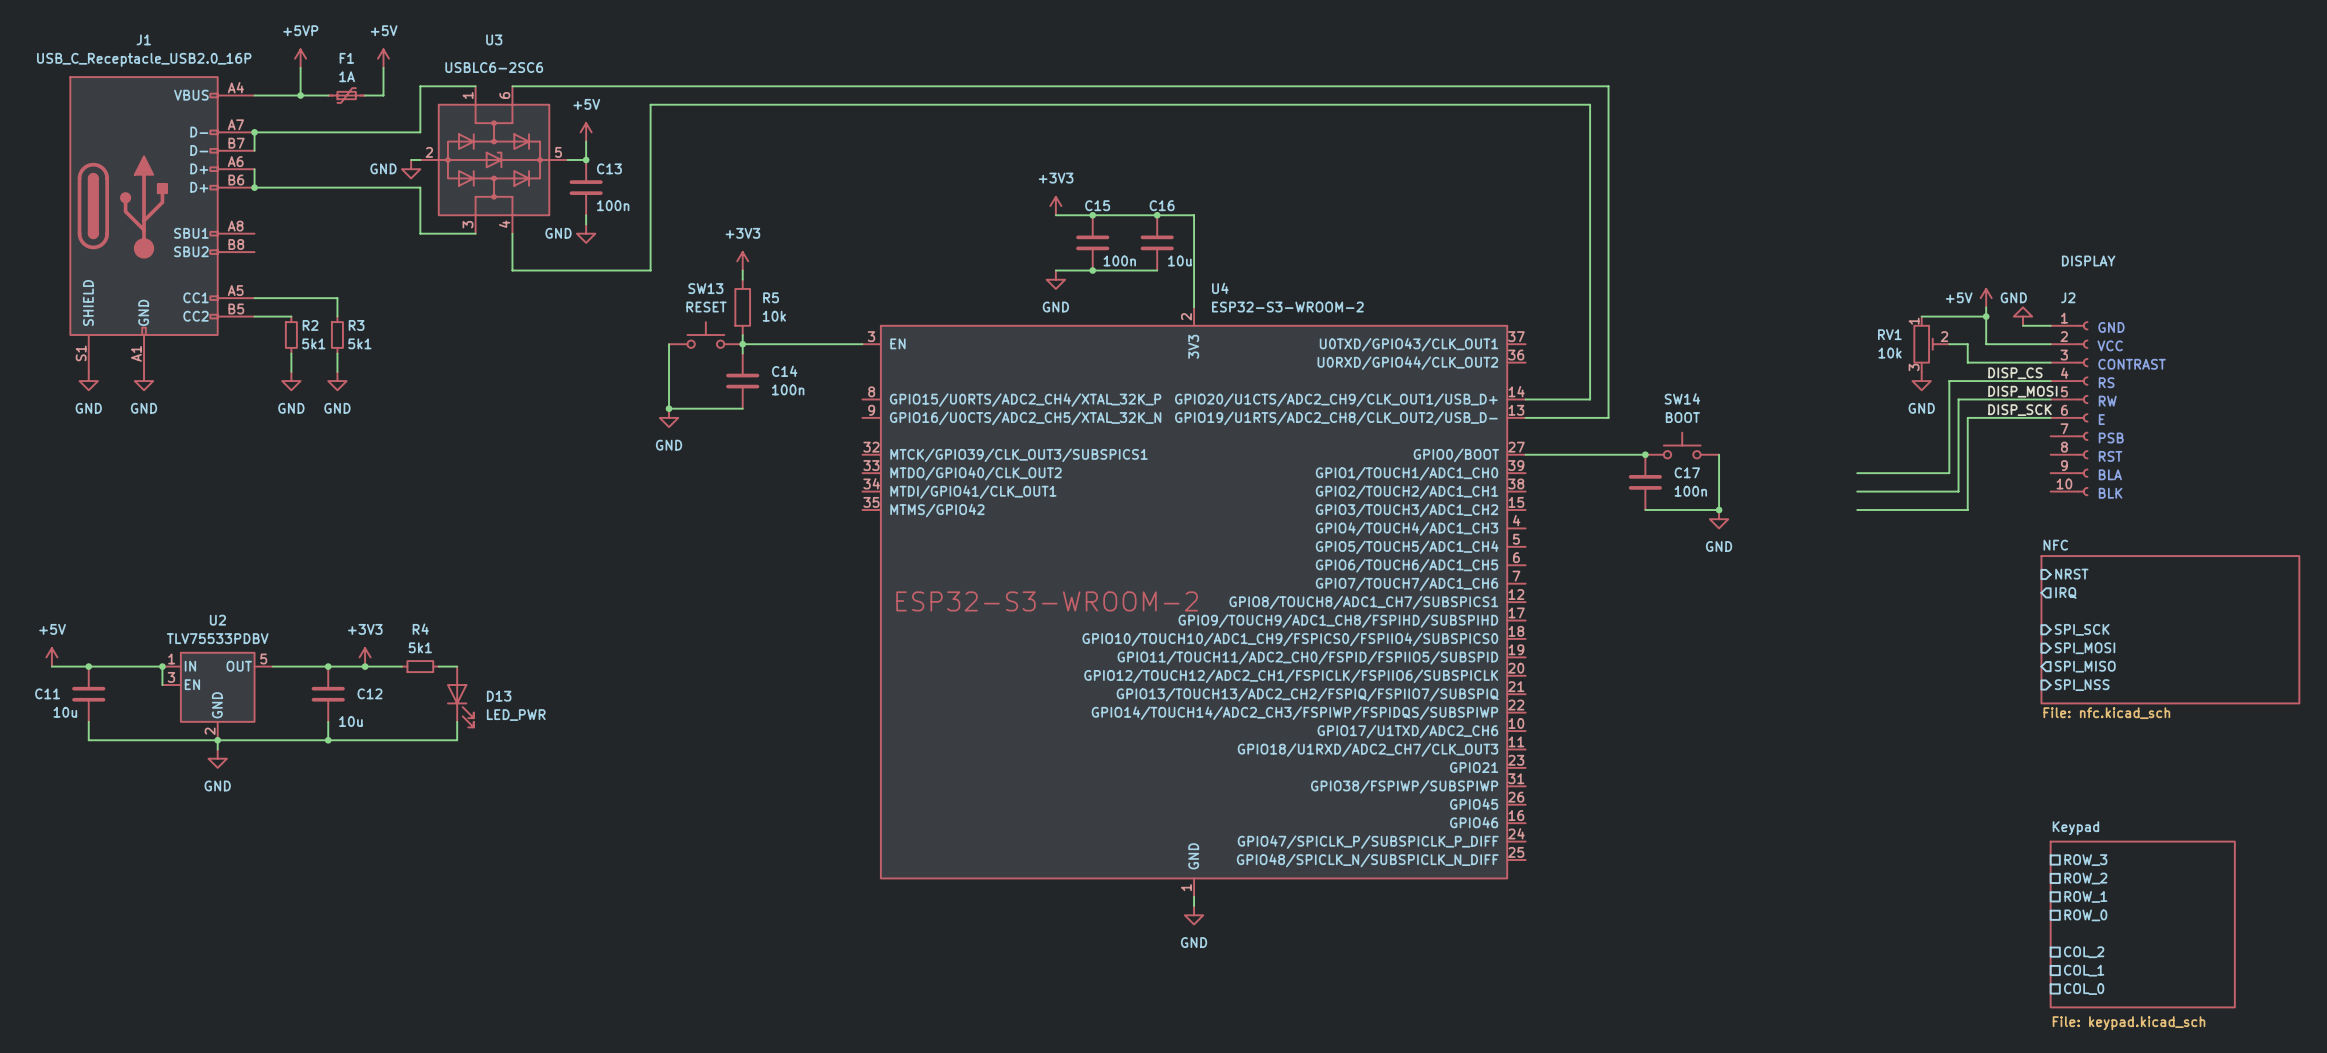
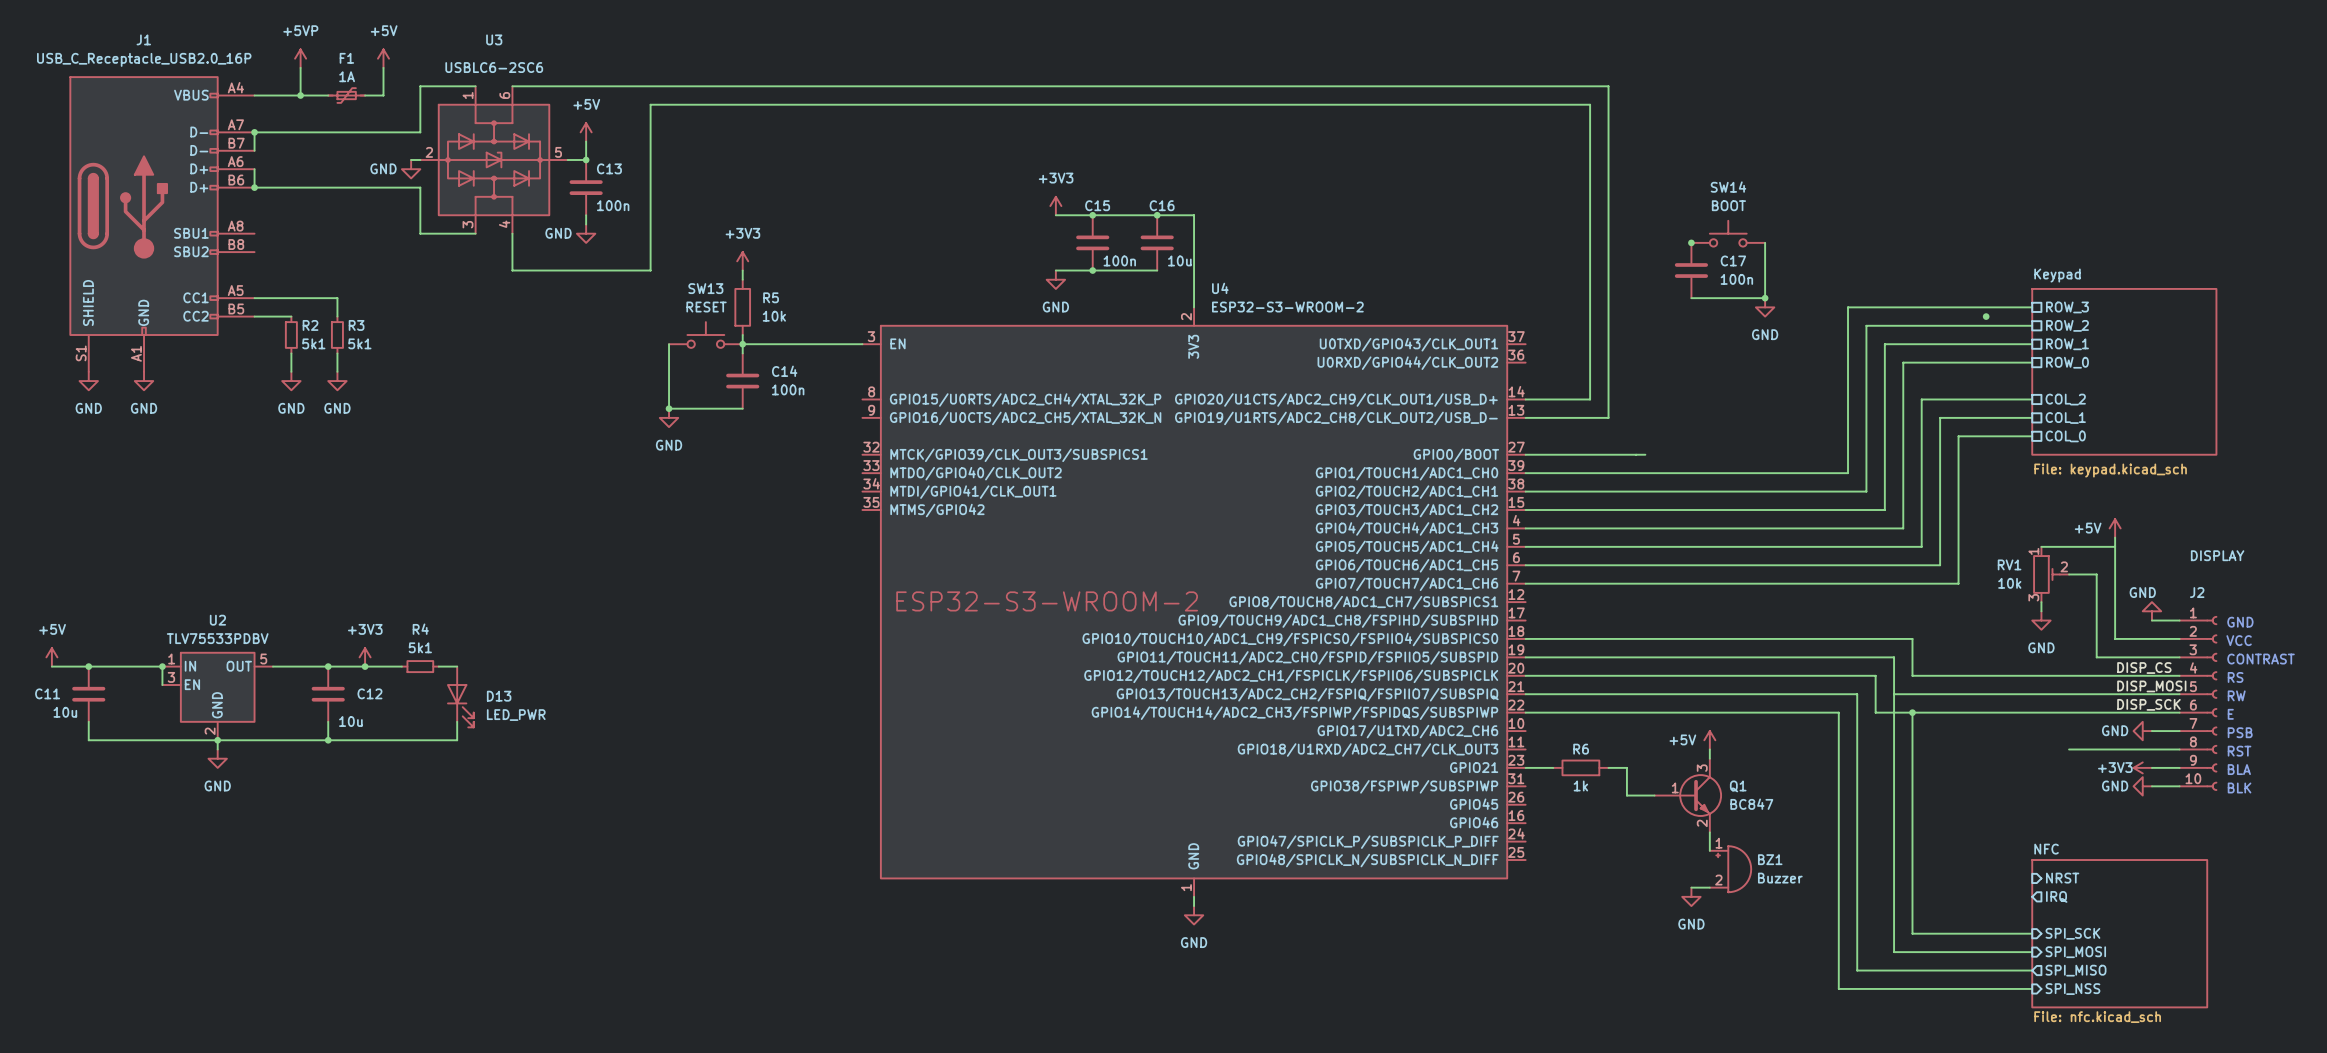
junction: none -> (1691, 242)
wire: none -> (1765, 242) (1765, 298) (1691, 298)
junction: none -> (1765, 298)
power symbol: +5V (1986, 298) -> none
power symbol: none -> GND (1765, 307)
wire: (1986, 307) (1986, 344) -> none
wire: none -> (2032, 307) (1848, 307) (1848, 473) (1525, 473)
sheet pin: none -> ROW_3 (2067, 307)
wire: (1921, 316) (1986, 316) -> none
power symbol: GND (2023, 316) -> none
wire: (2032, 325) (2050, 325) -> none
sheet pin: none -> ROW_2 (2067, 325)
text: GND (2111, 327) -> none
RV1 position: (1931, 344) -> (2051, 574)
wire: (1967, 344) (1967, 362) -> (1967, 344) (1986, 344)
wire: (2032, 344) (2050, 344) -> none
sheet pin: none -> ROW_1 (2067, 344)
text: VCC (2110, 345) -> none
wire: none -> (1967, 362) (1903, 362) (1903, 528) (1525, 528)
wire: (2032, 362) (2050, 362) -> none
sheet pin: none -> ROW_0 (2067, 362)
text: CONTRAST (2132, 364) -> none
sheet Keypad: none -> File: keypad.kicad_sch (2124, 371)
label: DISP_CS (2015, 373) -> none
power symbol: GND (1921, 381) -> none
wire: (2050, 381) (1949, 381) (1949, 473) (1857, 473) -> none
text: RS (2106, 382) -> none
label: DISP_MOSI (2022, 391) -> none
wire: (1958, 399) (1958, 436) -> (2032, 436) (1958, 436)
wire: none -> (1958, 399) (1921, 399) (1921, 546) (1525, 546)
wire: (2032, 399) (2050, 399) -> none
sheet pin: none -> COL_2 (2065, 399)
text: RW (2107, 401) -> none
J2 position: (2069, 408) -> (2198, 703)
label: DISP_SCK (2020, 410) -> none
wire: (1967, 417) (1967, 510) (1884, 510) -> (1949, 344) (1884, 344) (1884, 510)
wire: none -> (1967, 417) (1940, 417) (1940, 565) (1525, 565)
wire: (2032, 417) (2050, 417) -> none
sheet pin: none -> COL_1 (2065, 417)
text: E (2101, 419) -> none
sheet pin: none -> COL_0 (2065, 436)
text: PSB (2111, 437) -> none
SW14 position: (1682, 445) -> (1728, 233)
junction: (1645, 454) -> none
wire: (1719, 454) (1719, 510) -> (1857, 510) (1719, 510)
text: RST (2110, 456) -> none
text: BLA (2110, 474) -> none
C17 position: (1645, 482) -> (1691, 270)
wire: none -> (1525, 491) (1857, 491)
wire: (1866, 491) (1958, 491) -> (1866, 491) (1866, 325) (2023, 325)
wire: none -> (1958, 491) (1958, 583) (1525, 583)
text: BLK (2110, 493) -> none
wire: none -> (1525, 510) (1645, 510)
junction: (1719, 510) -> none
power symbol: GND (1719, 519) -> none
power symbol: none -> +5V (2115, 528)
wire: none -> (2115, 537) (2115, 638) (2179, 638)
wire: none -> (2041, 546) (2115, 546)
wire: none -> (2069, 574) (2096, 574) (2096, 657) (2179, 657)
sheet pin: NRST (2071, 574) -> none
sheet pin: IRQ (2065, 592) -> none
power symbol: none -> GND (2151, 611)
power symbol: none -> GND (2041, 620)
wire: none -> (2151, 620) (2179, 620)
text: none -> GND (2240, 622)
sheet pin: SPI_SCK (2082, 629) -> none
sheet NFC: File: nfc.kicad_sch (2170, 629) -> none
wire: none -> (1525, 638) (1912, 638) (1912, 675) (2179, 675)
text: none -> VCC (2239, 640)
sheet pin: SPI_MOSI (2085, 648) -> none
wire: none -> (1525, 657) (1894, 657) (1894, 952) (2032, 952)
text: none -> CONTRAST (2261, 659)
sheet pin: SPI_MISO (2085, 666) -> none
label: none -> DISP_CS (2144, 668)
wire: none -> (1525, 675) (1875, 675) (1875, 712) (2179, 712)
text: none -> RS (2235, 677)
sheet pin: SPI_NSS (2082, 685) -> none
label: none -> DISP_MOSI (2151, 686)
wire: none -> (1525, 694) (1857, 694) (1857, 970) (2032, 970)
wire: none -> (1894, 694) (2179, 694)
text: none -> RW (2236, 695)
label: none -> DISP_SCK (2148, 704)
wire: none -> (1525, 712) (1838, 712) (1838, 988) (2032, 988)
wire: none -> (1912, 712) (1912, 933) (2032, 933)
junction: none -> (1912, 712)
text: none -> E (2230, 714)
power symbol: none -> GND (2142, 731)
wire: none -> (2151, 731) (2179, 731)
text: none -> PSB (2240, 732)
power symbol: none -> +5V (1709, 740)
wire: none -> (1709, 749) (1709, 758)
wire: none -> (2069, 749) (2179, 749)
text: none -> RST (2239, 751)
wire: none -> (1525, 767) (1553, 767)
R6: none -> 1k (1580, 767)
wire: none -> (1608, 767) (1626, 767) (1626, 795) (1654, 795)
power symbol: none -> +3V3 (2142, 767)
wire: none -> (2151, 767) (2179, 767)
text: none -> BLA (2239, 769)
power symbol: none -> GND (2142, 786)
wire: none -> (2151, 786) (2179, 786)
text: none -> BLK (2239, 787)
Q1: none -> BC847 (1688, 795)
wire: none -> (1709, 832) (1709, 850)
sheet pin: ROW_3 (2085, 860) -> none
BZ1: none -> Buzzer (1730, 869)
sheet pin: none -> NRST (2062, 878)
sheet pin: ROW_2 (2085, 878) -> none
wire: none -> (1691, 887) (1709, 887)
power symbol: none -> GND (1691, 896)
sheet pin: none -> IRQ (2056, 896)
sheet pin: ROW_1 (2085, 896) -> none
sheet pin: ROW_0 (2085, 915) -> none
sheet Keypad: File: keypad.kicad_sch (2142, 924) -> none
sheet pin: none -> SPI_SCK (2072, 933)
sheet NFC: none -> File: nfc.kicad_sch (2119, 933)
sheet pin: none -> SPI_MOSI (2075, 952)
sheet pin: COL_2 (2084, 952) -> none
sheet pin: none -> SPI_MISO (2076, 970)
sheet pin: COL_1 (2084, 970) -> none
sheet pin: none -> SPI_NSS (2072, 989)
sheet pin: COL_0 (2084, 989) -> none

